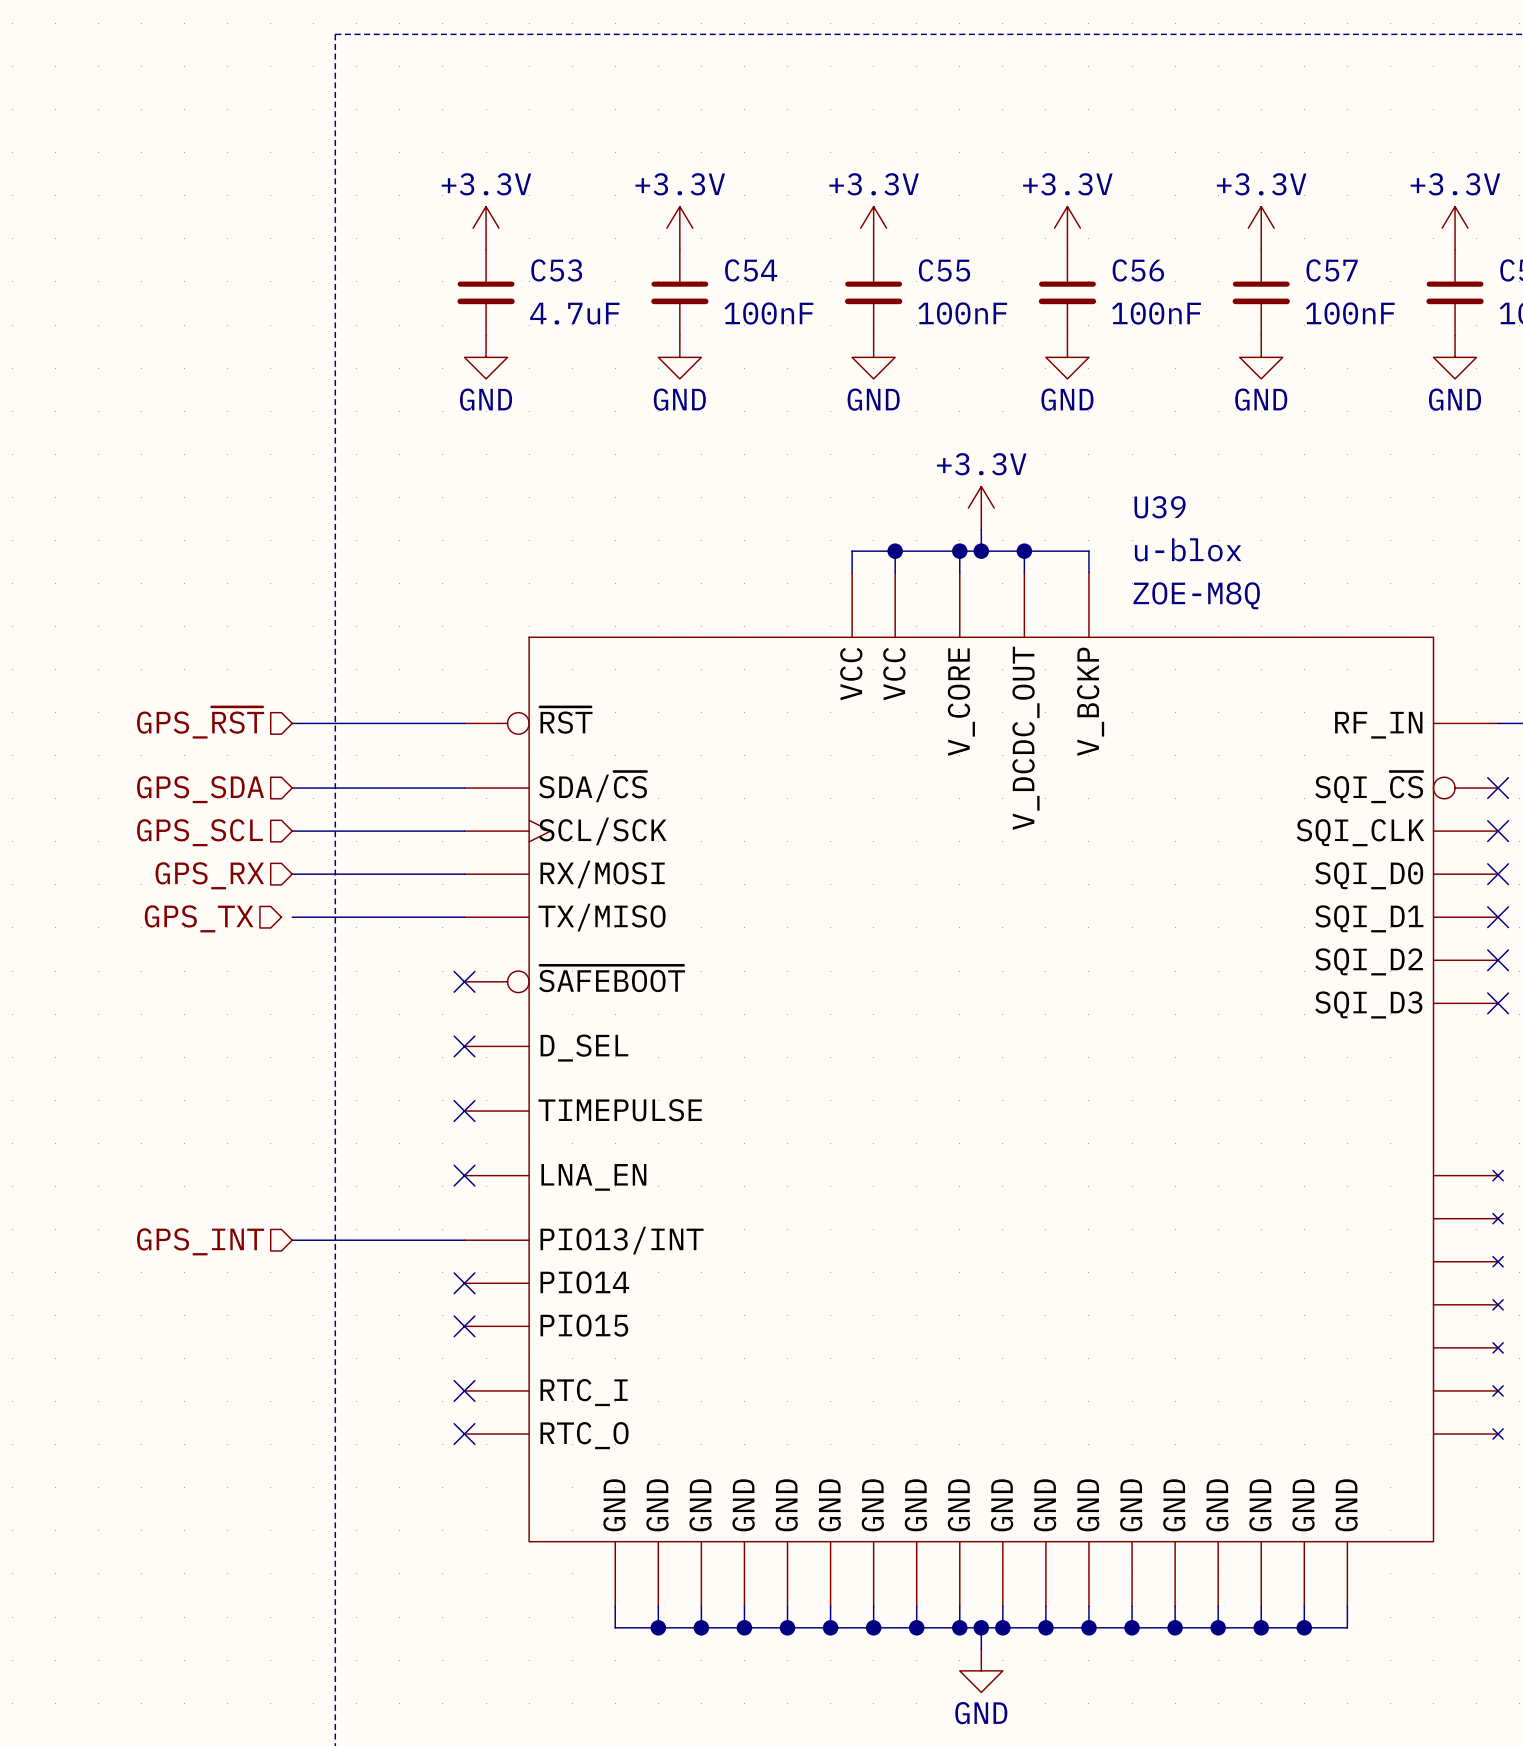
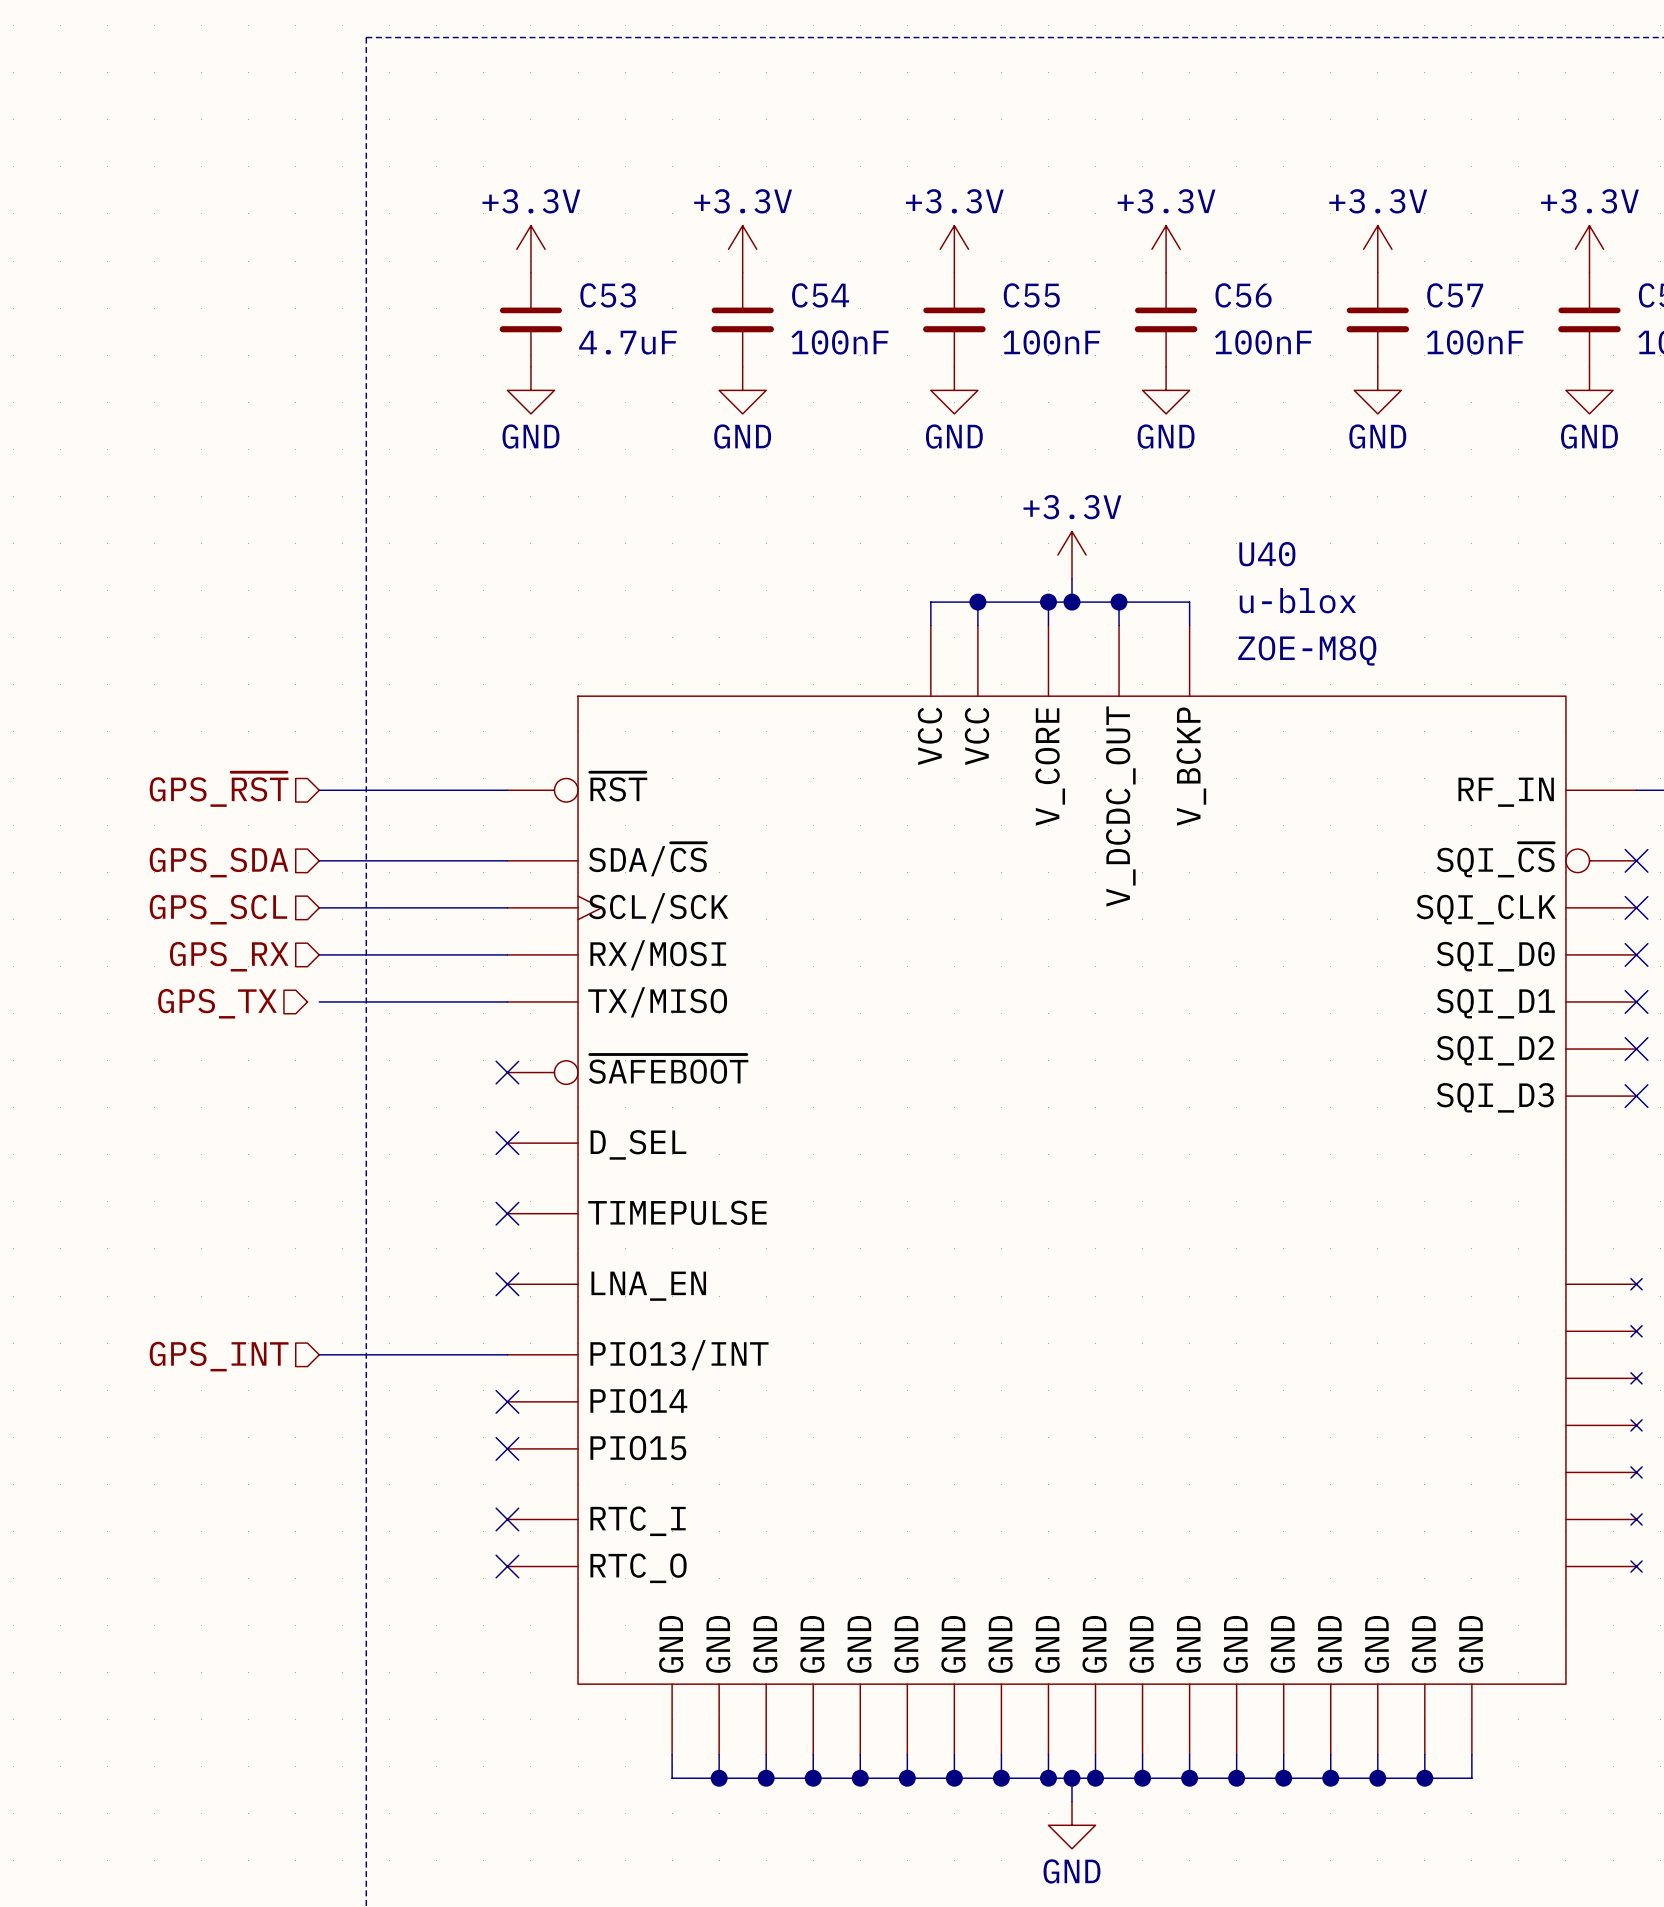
U39 name: U39 (1160, 507) -> U40 (1267, 554)

